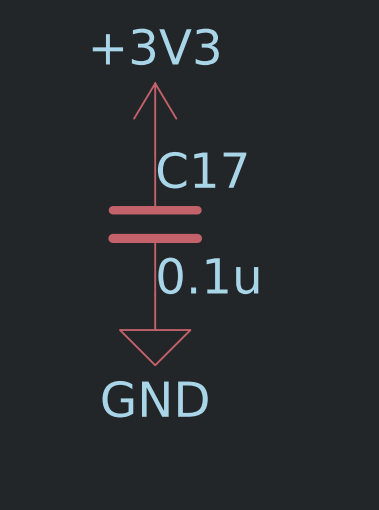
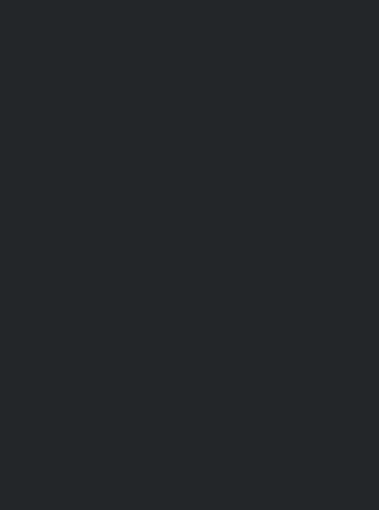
power symbol: +3V3 (155, 118) -> none
C17: 0.1u (155, 224) -> none
power symbol: GND (155, 330) -> none

